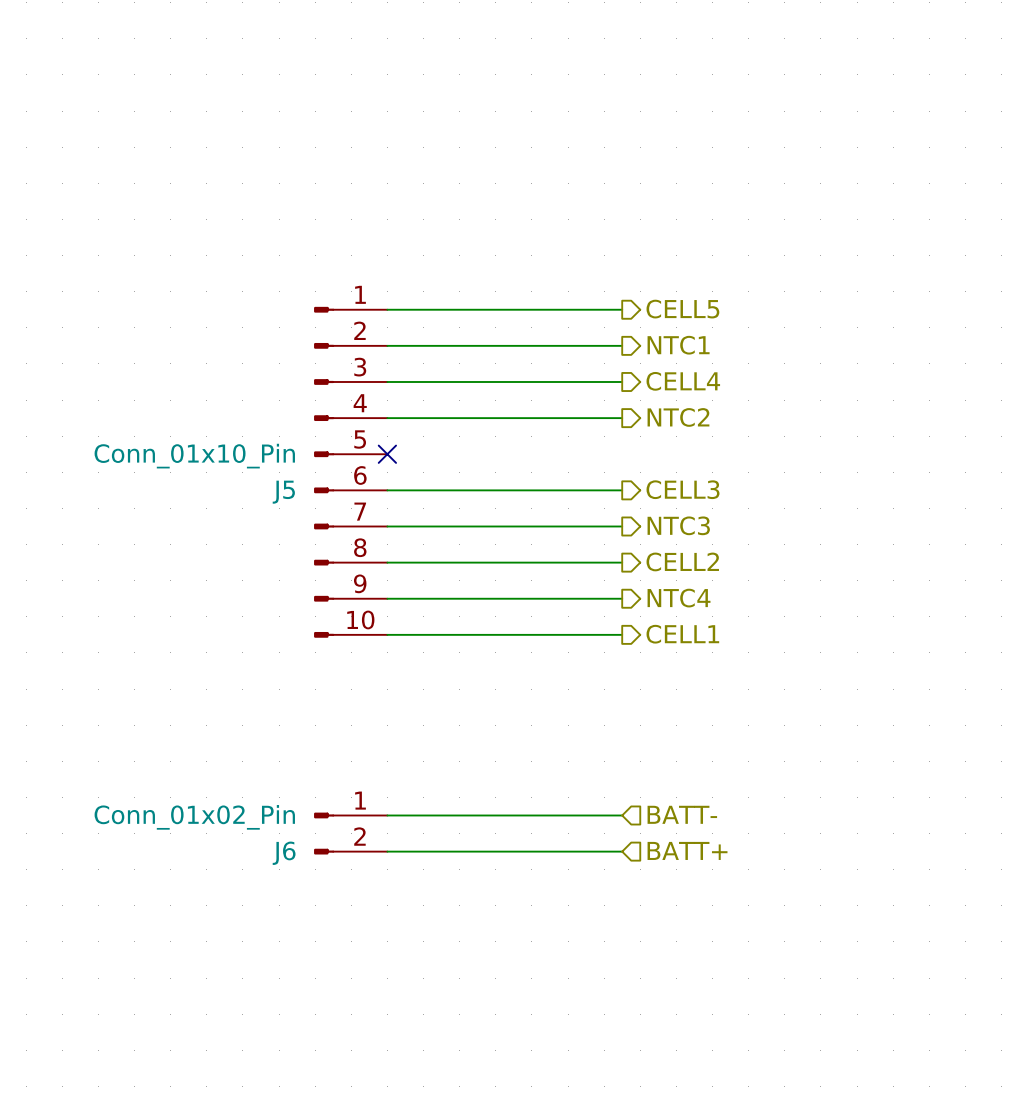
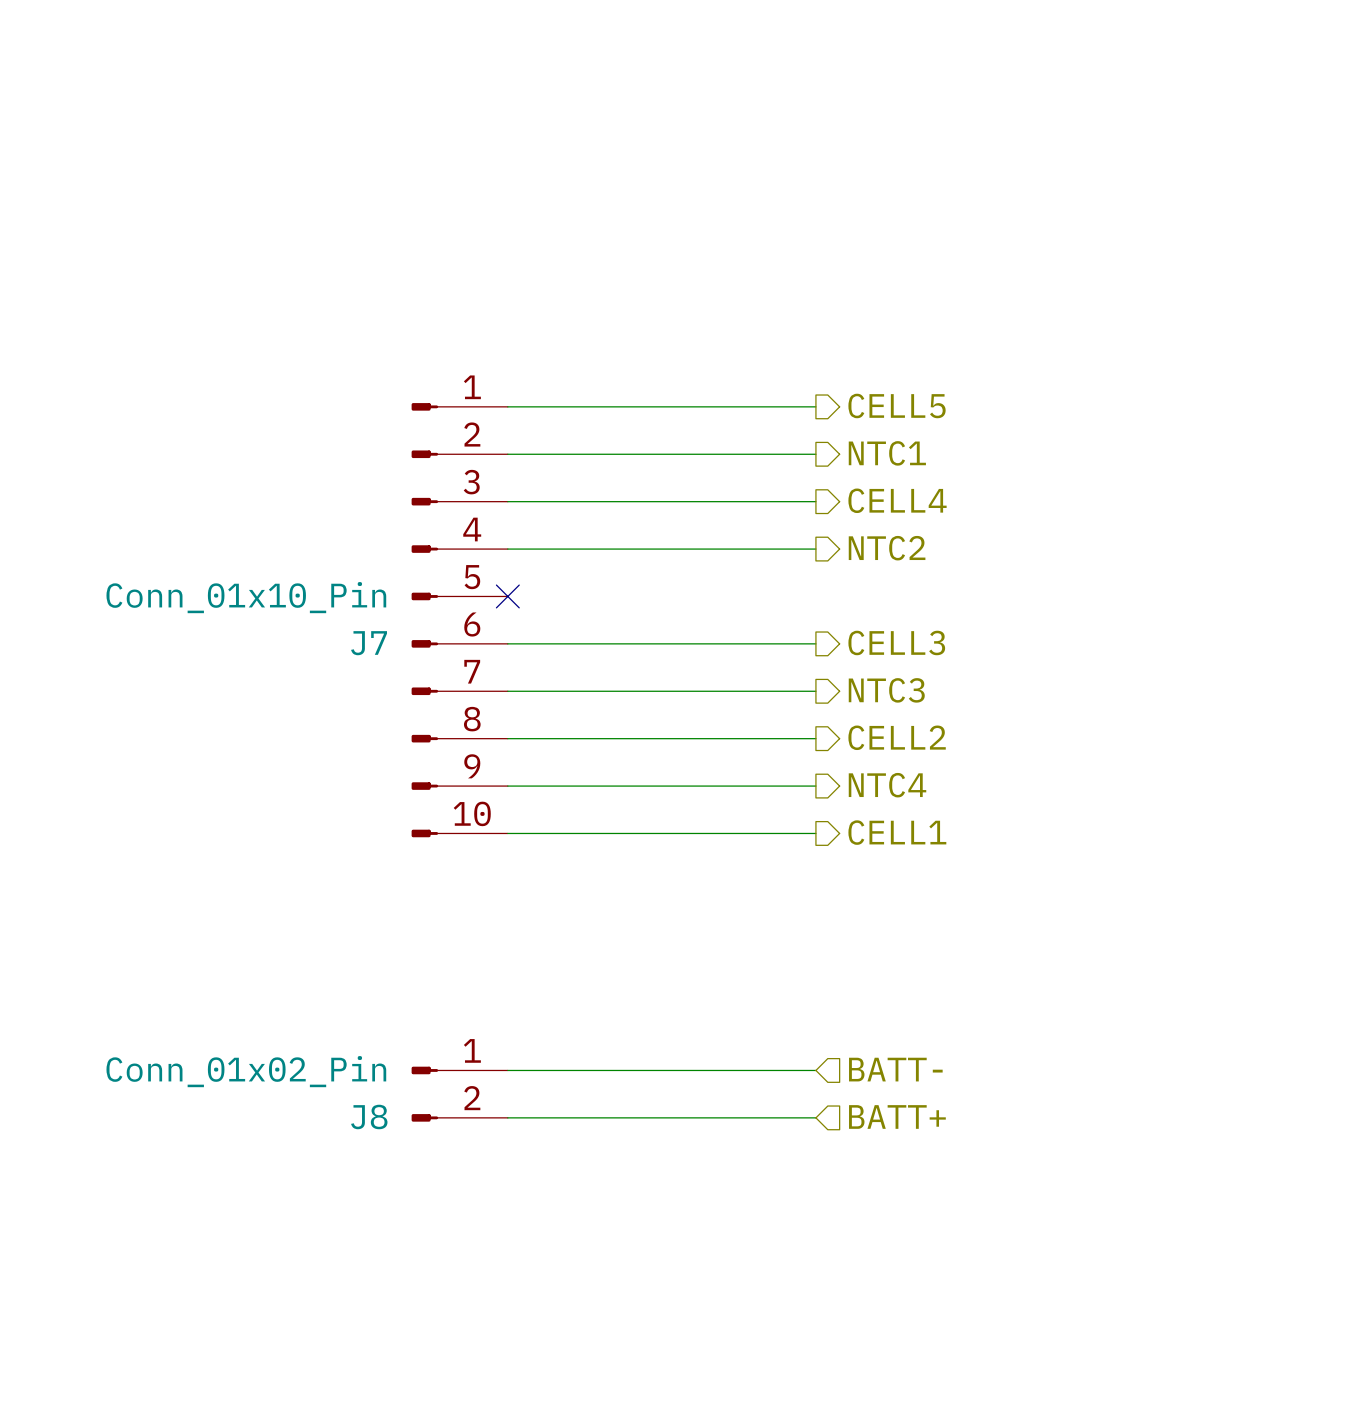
J5 name: J5 (283, 492) -> J7 (369, 643)
J6 name: J6 (284, 853) -> J8 (369, 1116)

